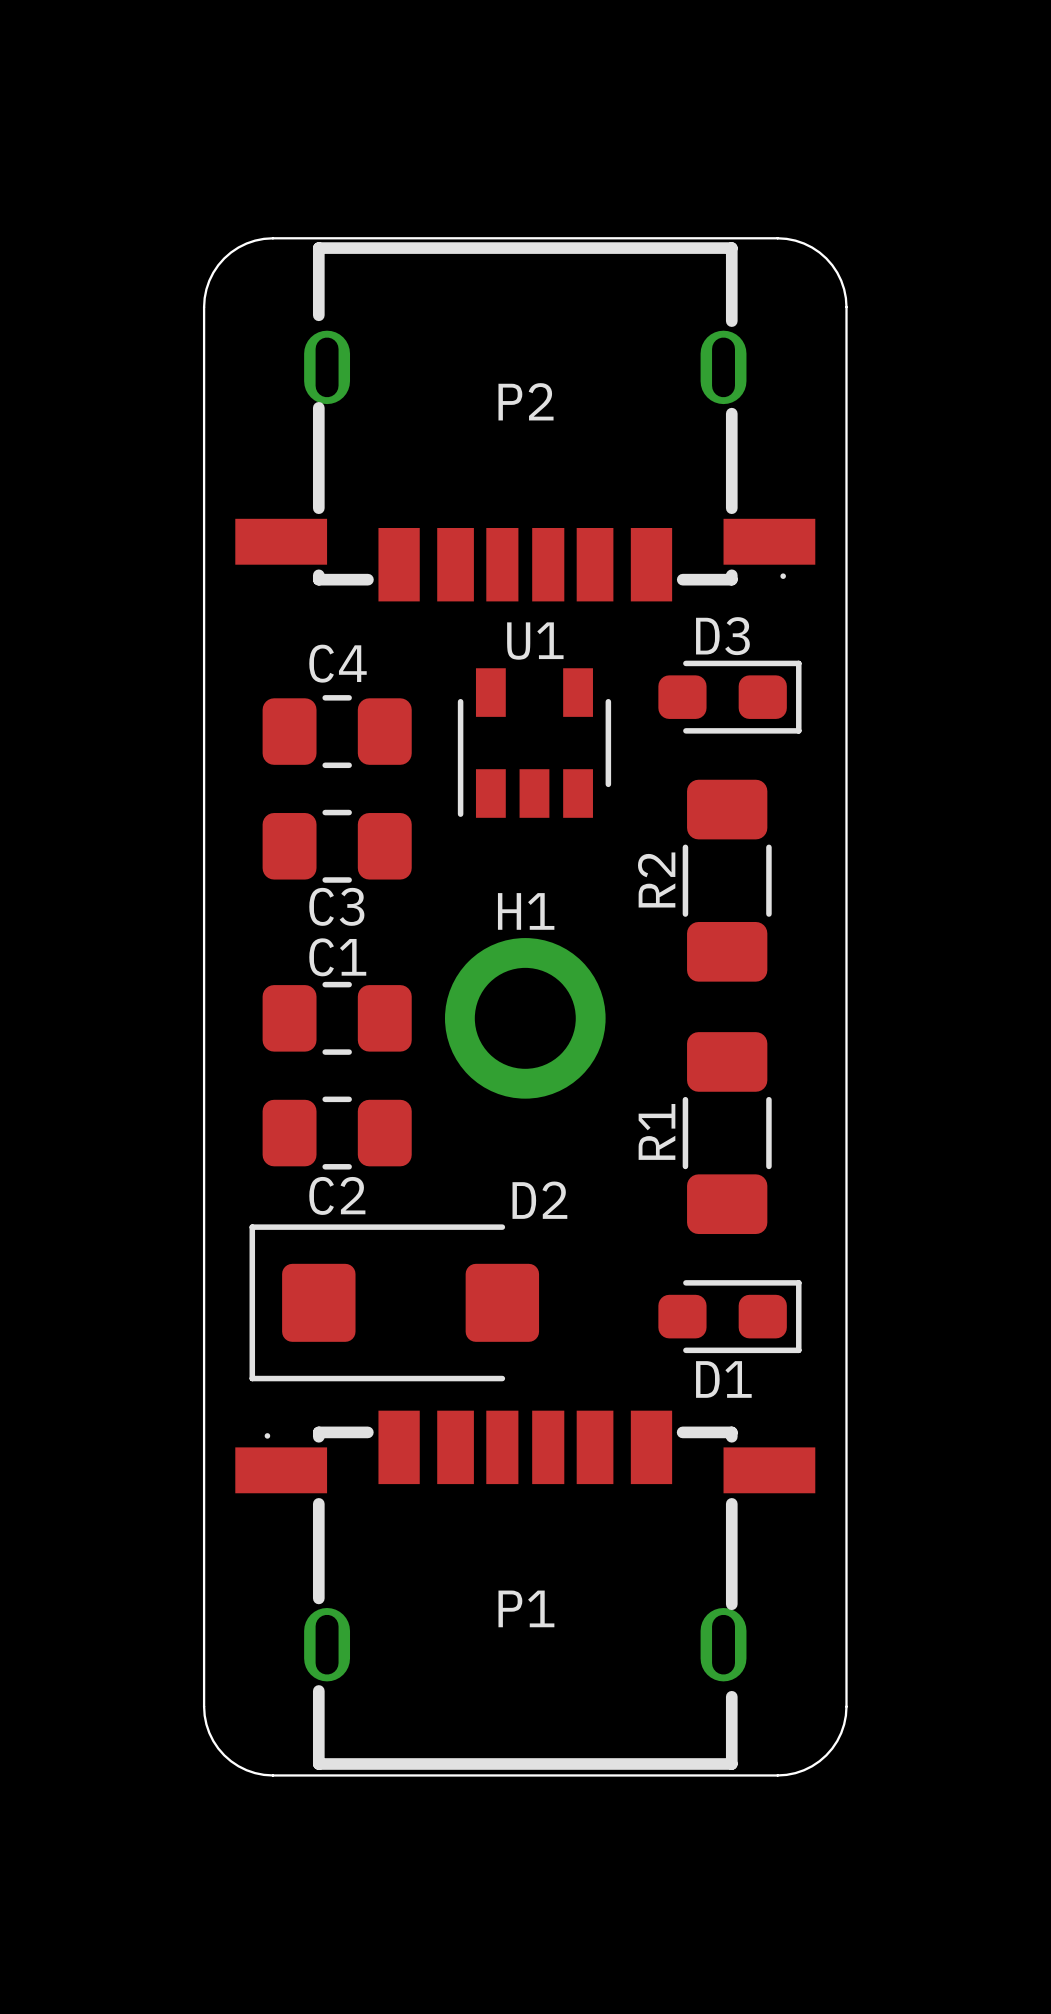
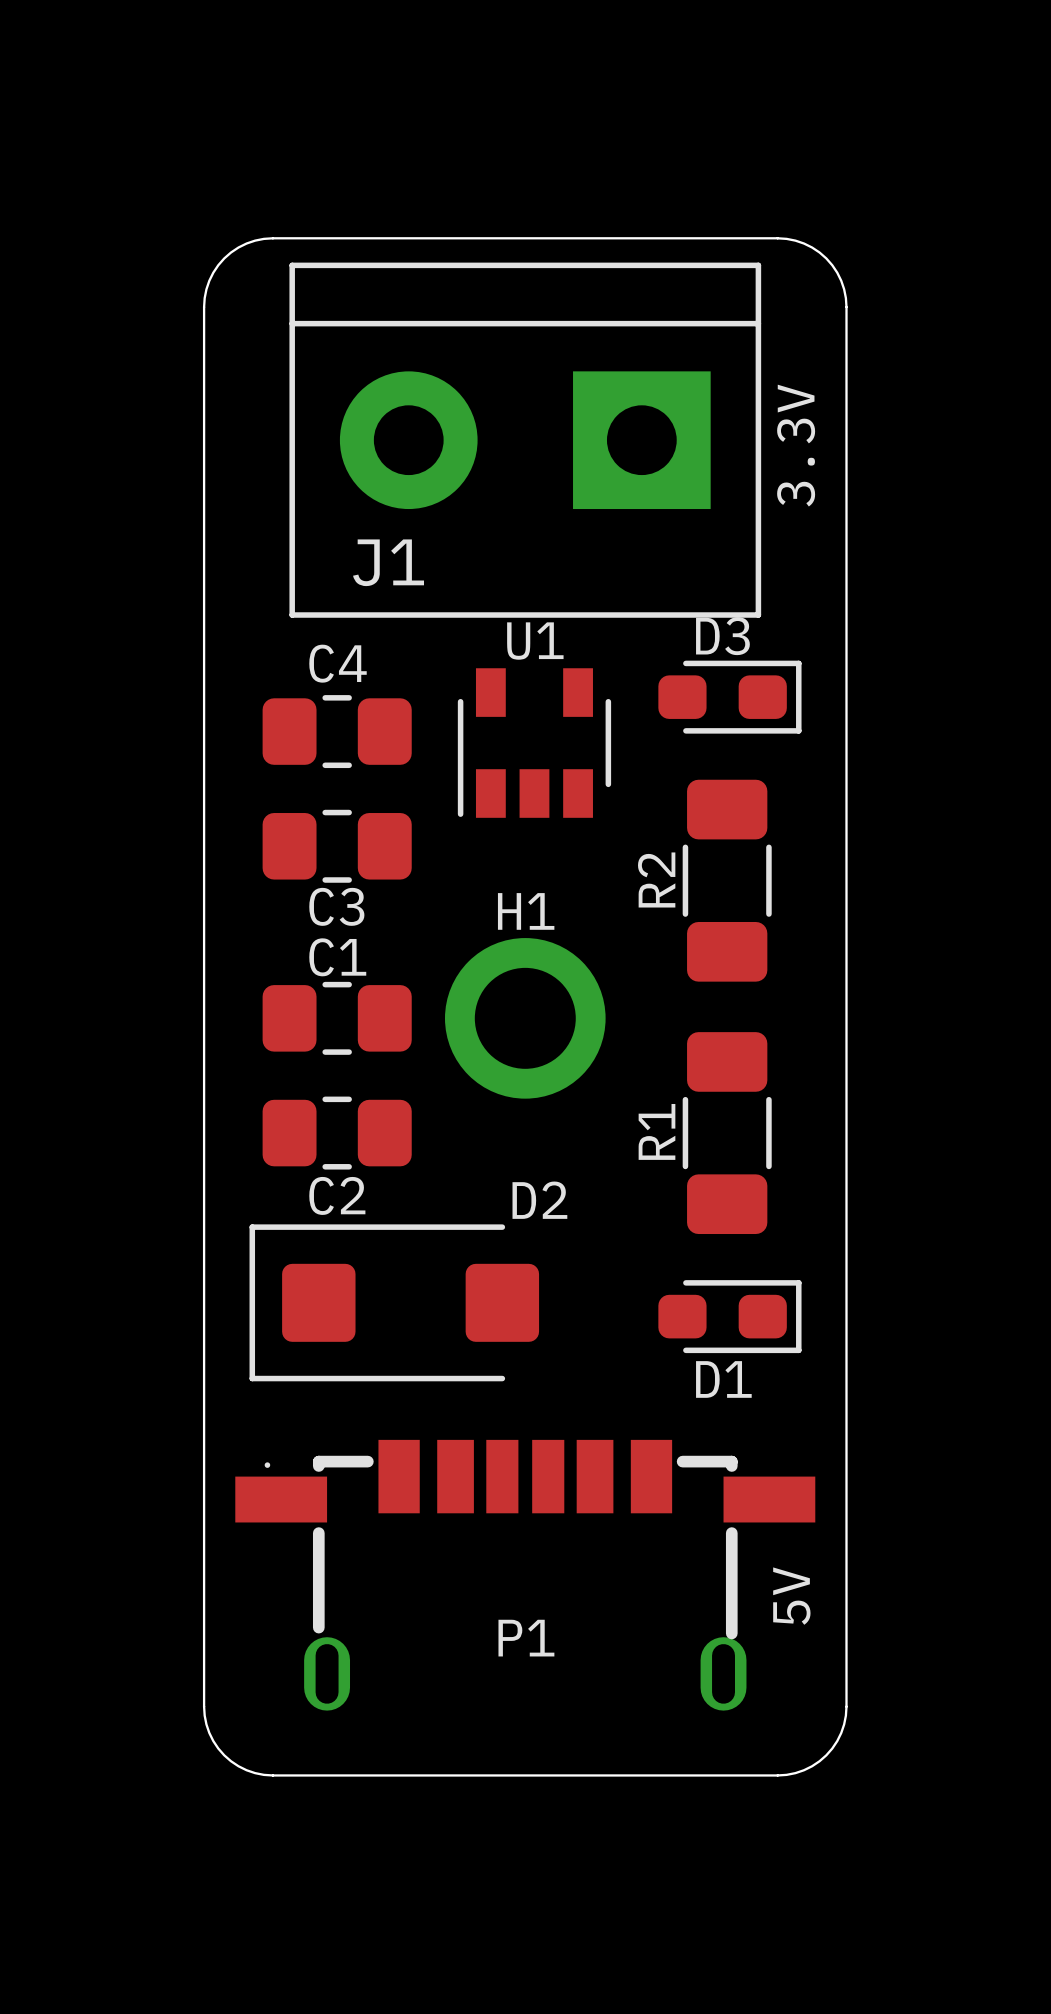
P2: (525, 421) -> none
J1: none -> (525, 440)
text: none -> 3.3V (796, 445)
P1 footprint: [235, 1410, 816, 1770] -> [235, 1439, 816, 1711]
text: none -> 5V (791, 1596)

